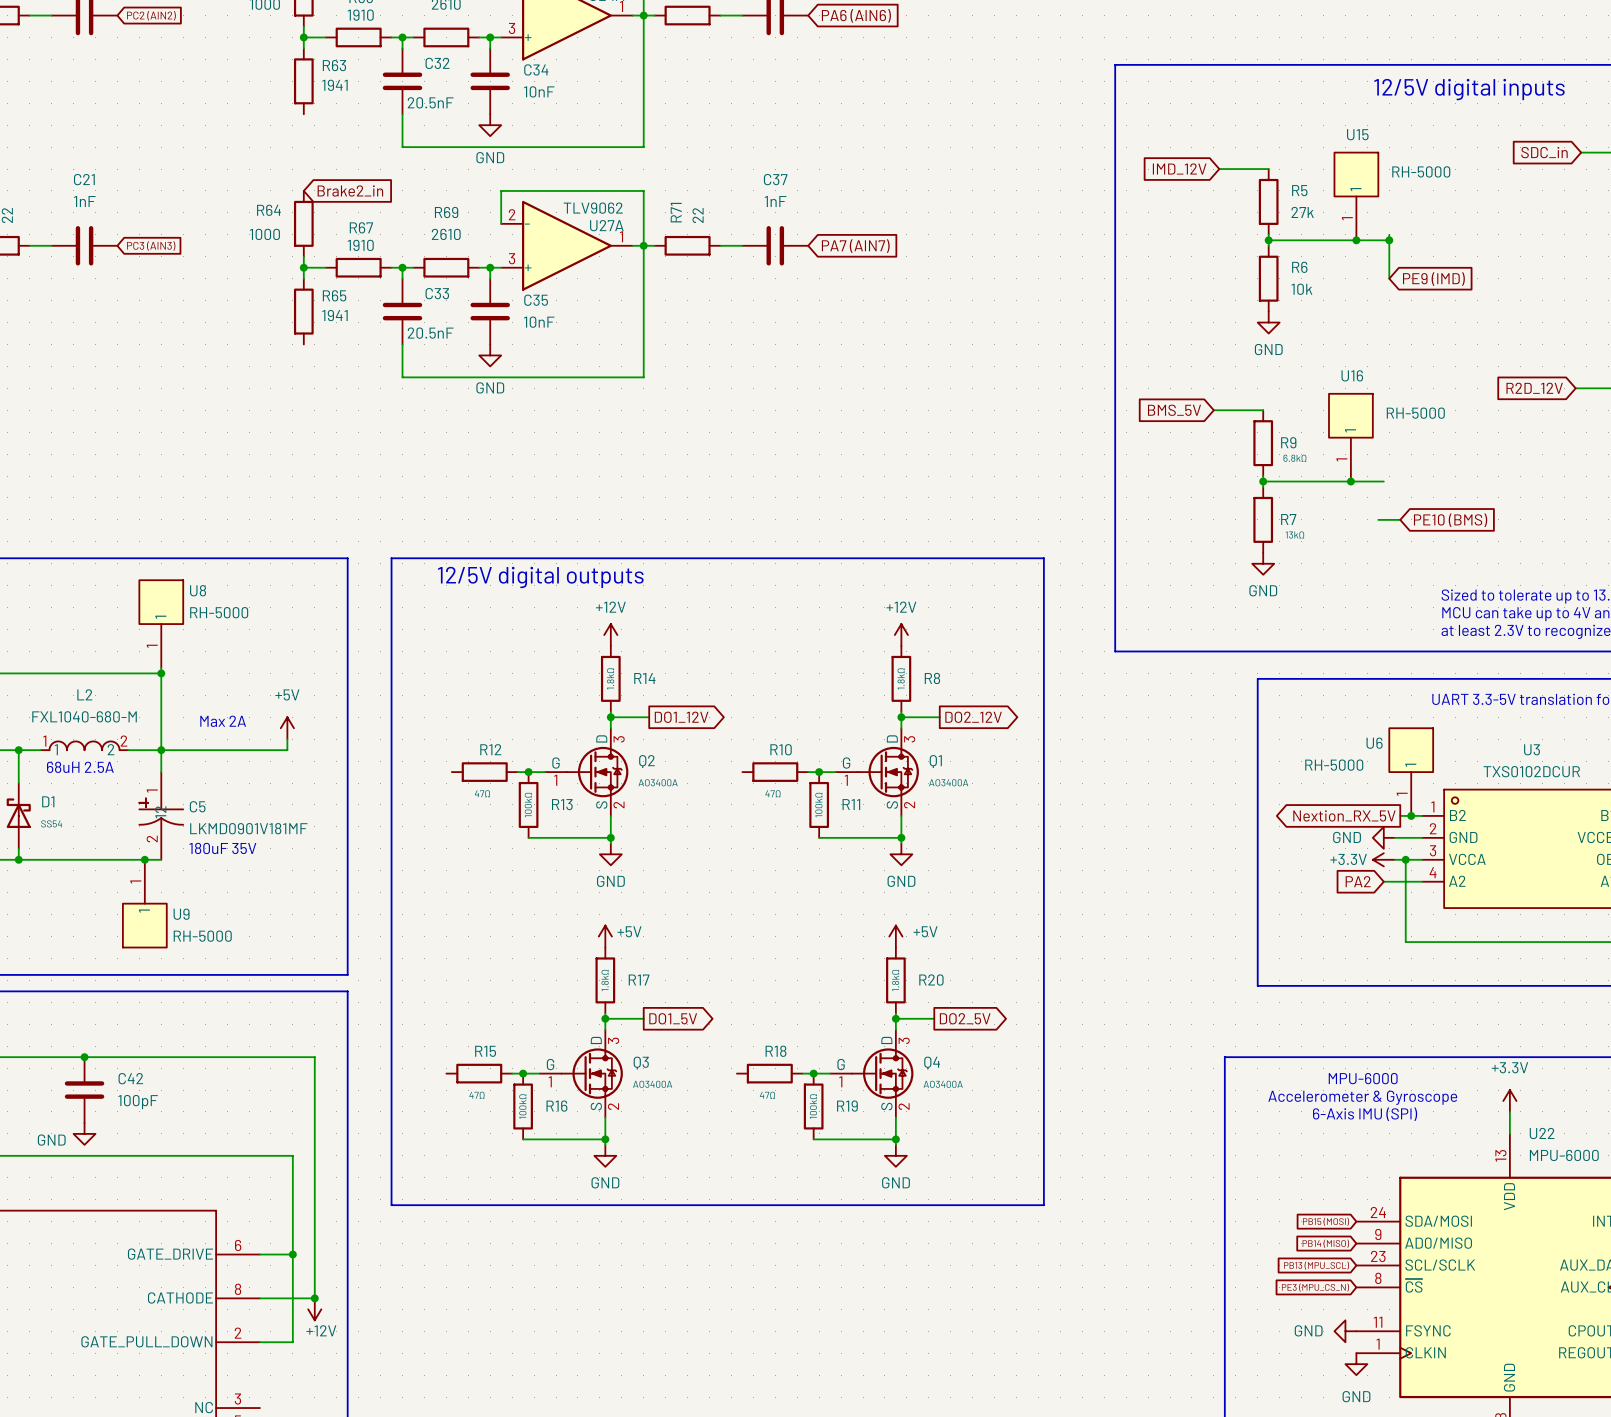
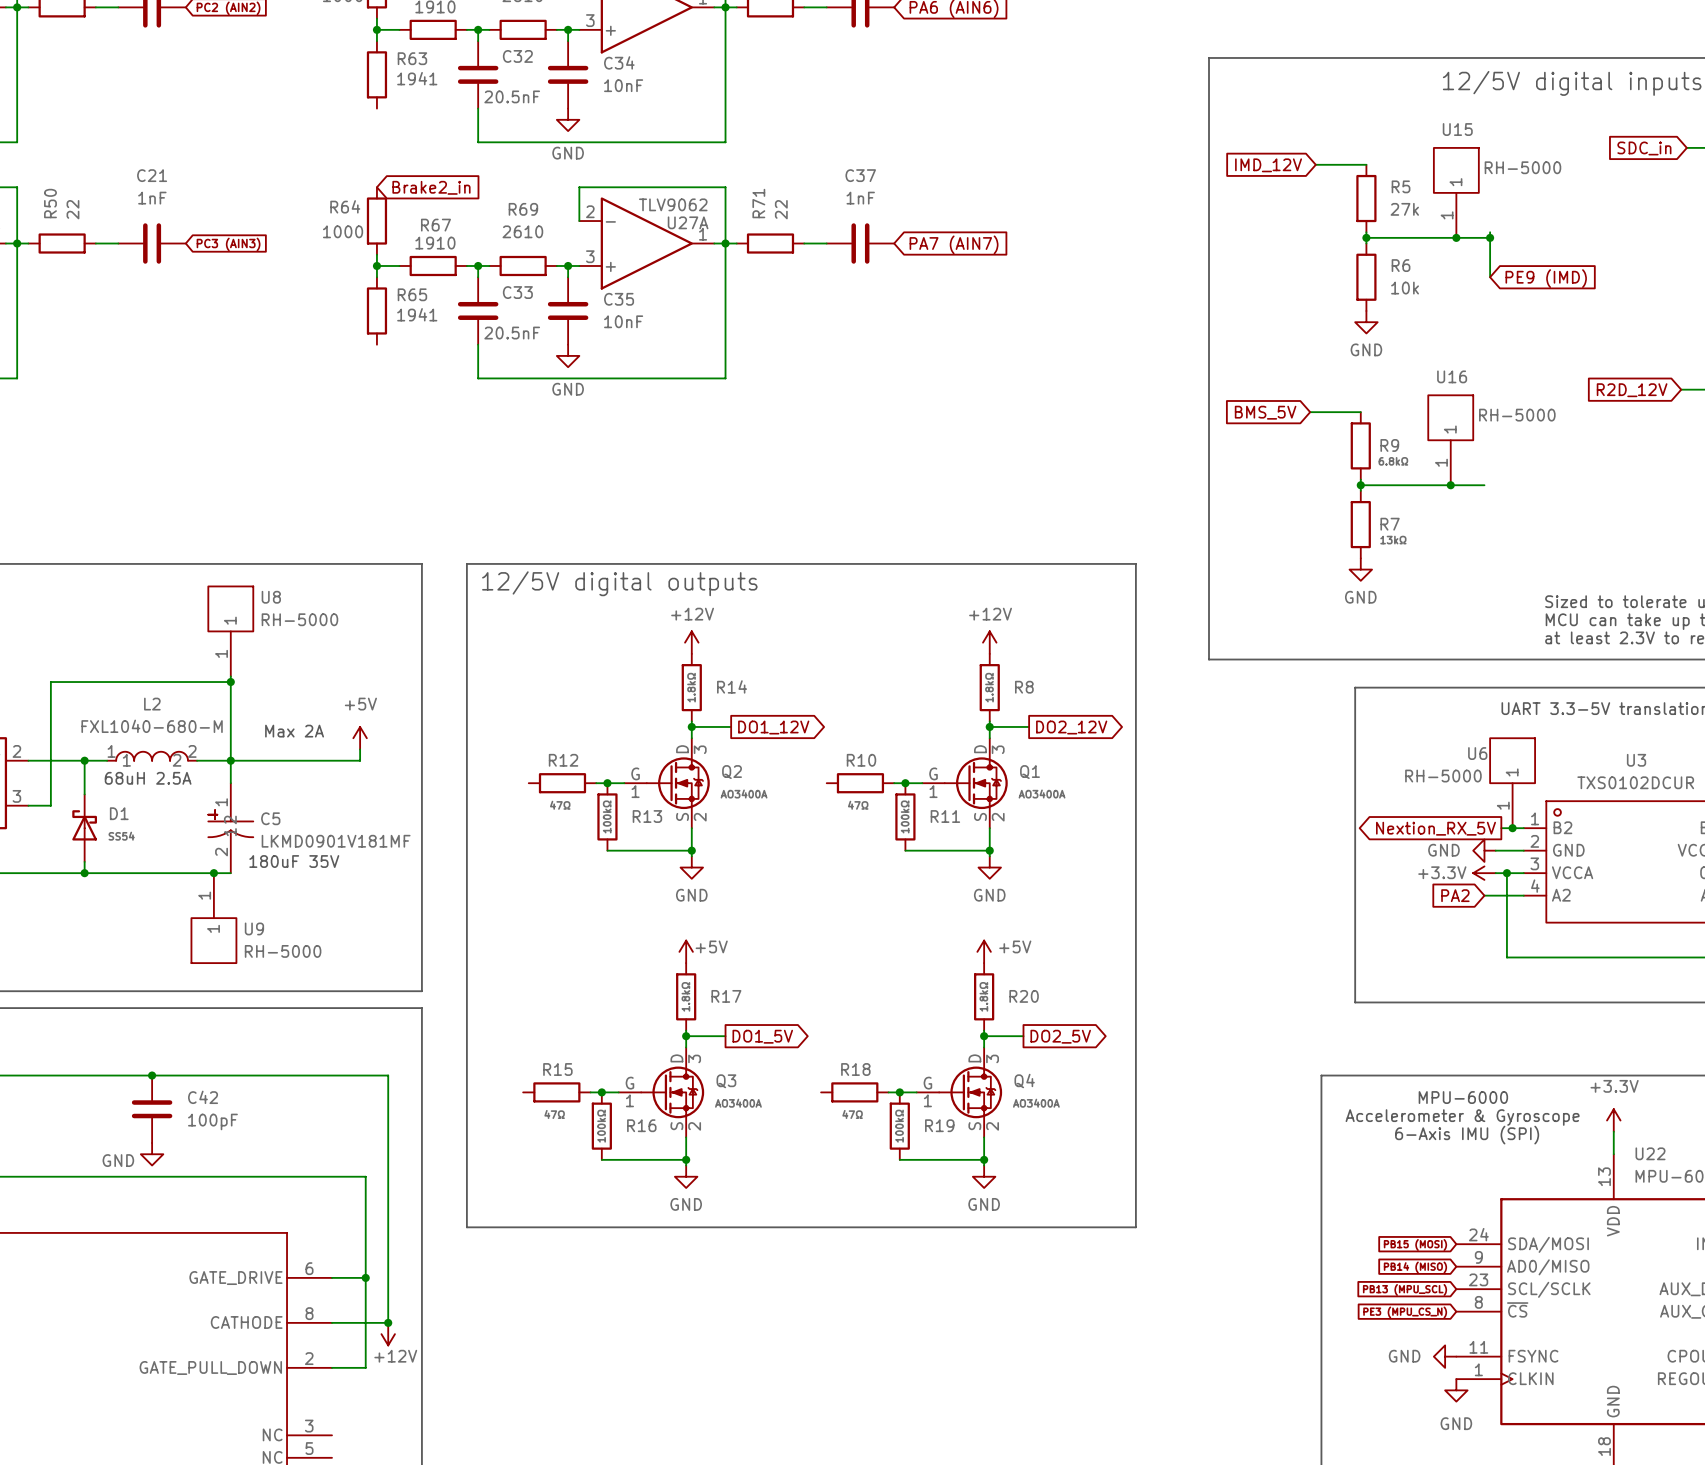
wire: (1378, 519) (1400, 519) -> none
global label: PE10 (BMS) (1450, 520) -> none

